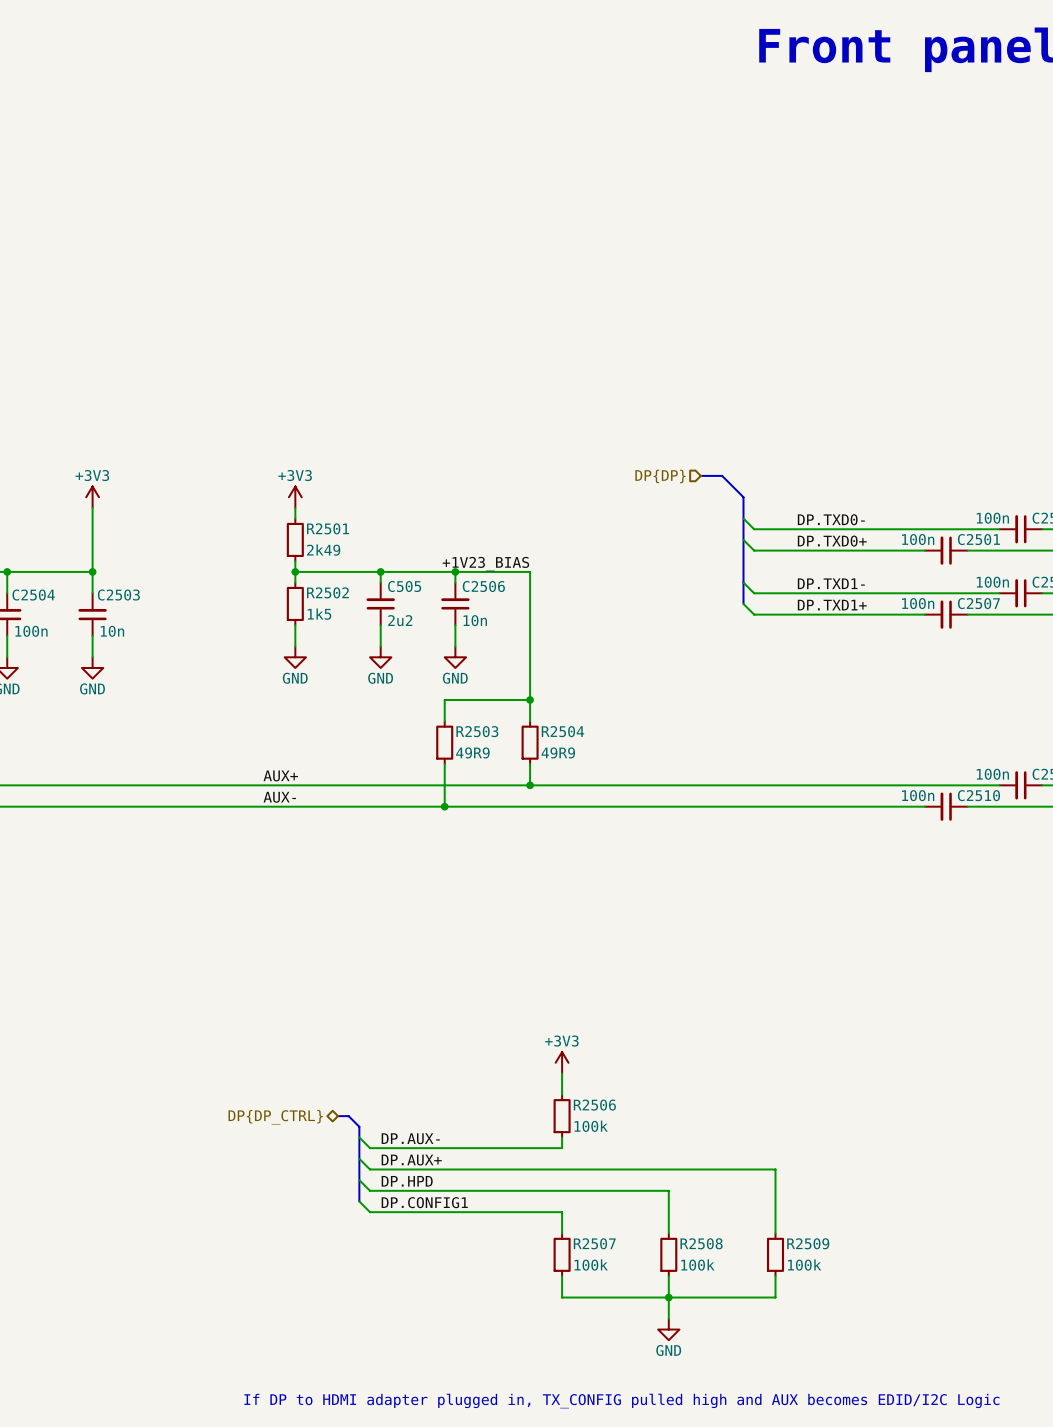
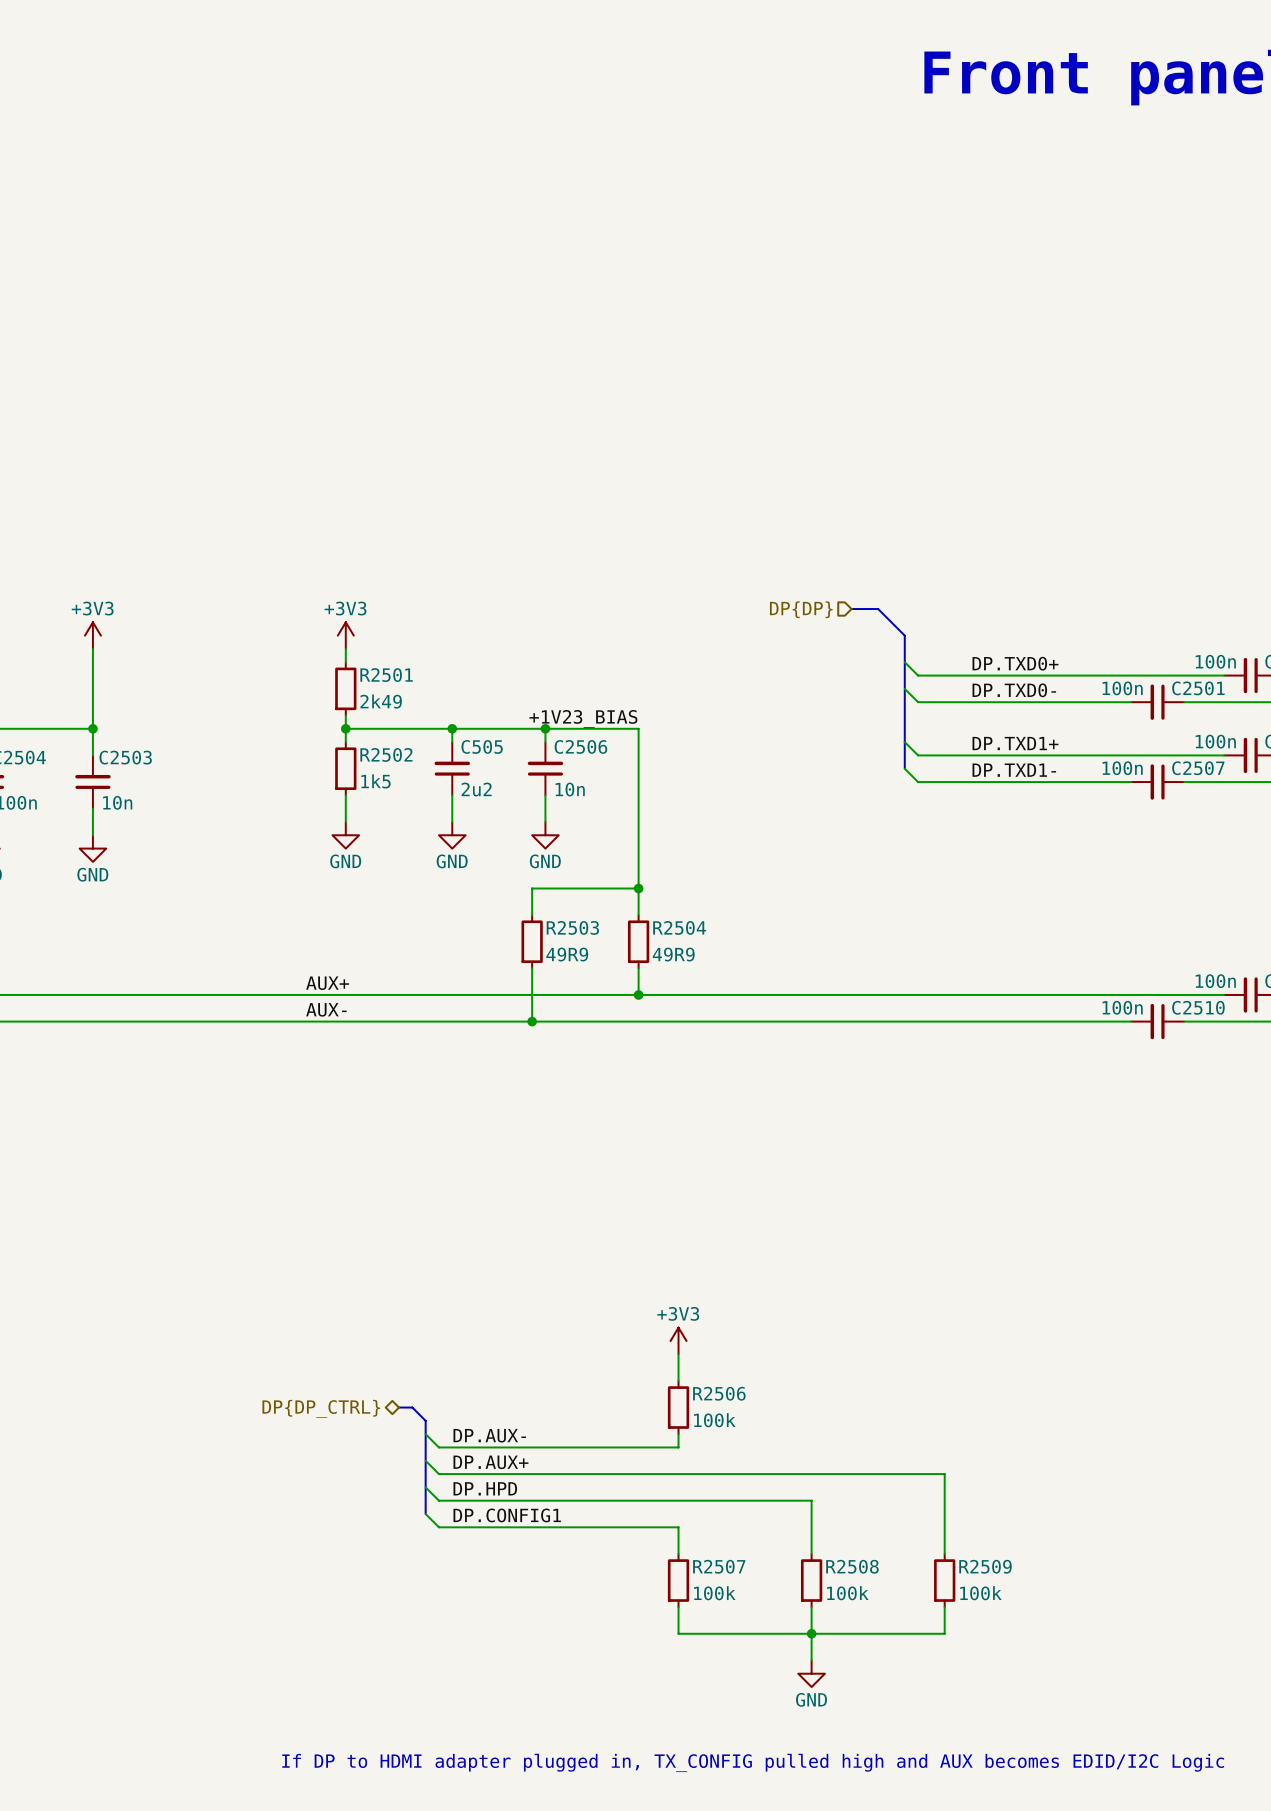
label: DP.TXD0- (831, 519) -> DP.TXD0+ (1015, 663)
label: DP.TXD0+ (832, 541) -> DP.TXD0- (1014, 690)
label: DP.TXD1- (831, 583) -> DP.TXD1+ (1015, 743)
label: DP.TXD1+ (832, 605) -> DP.TXD1- (1014, 770)

